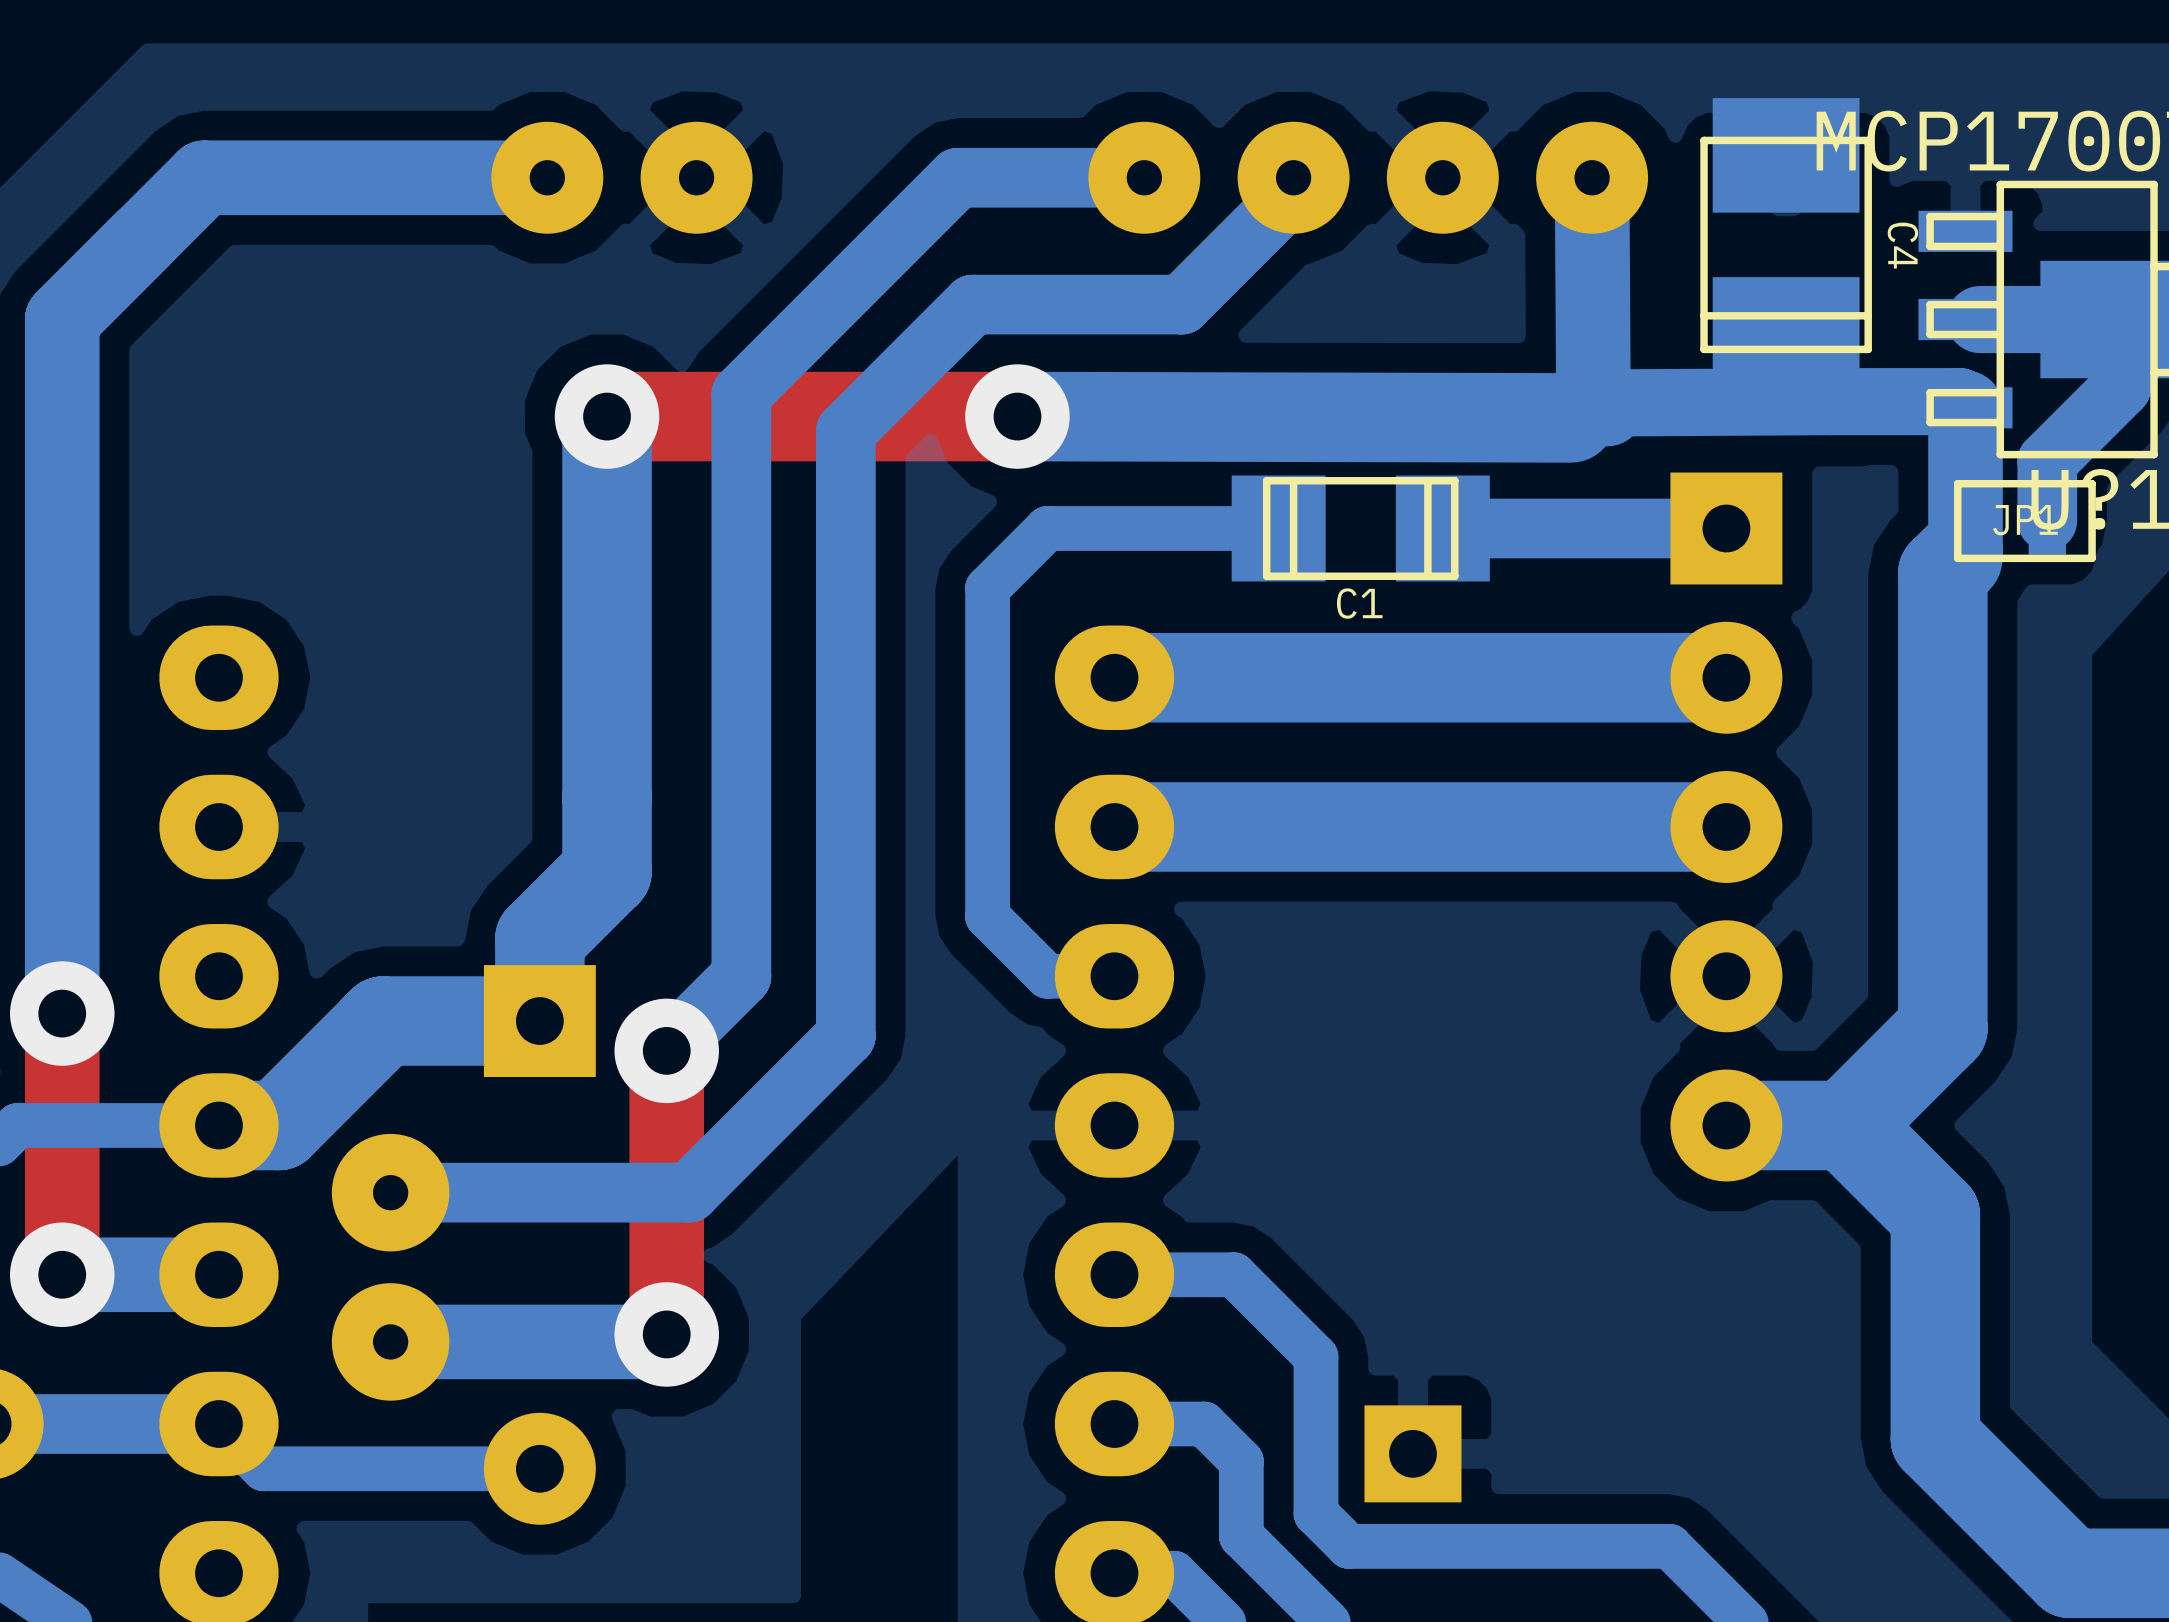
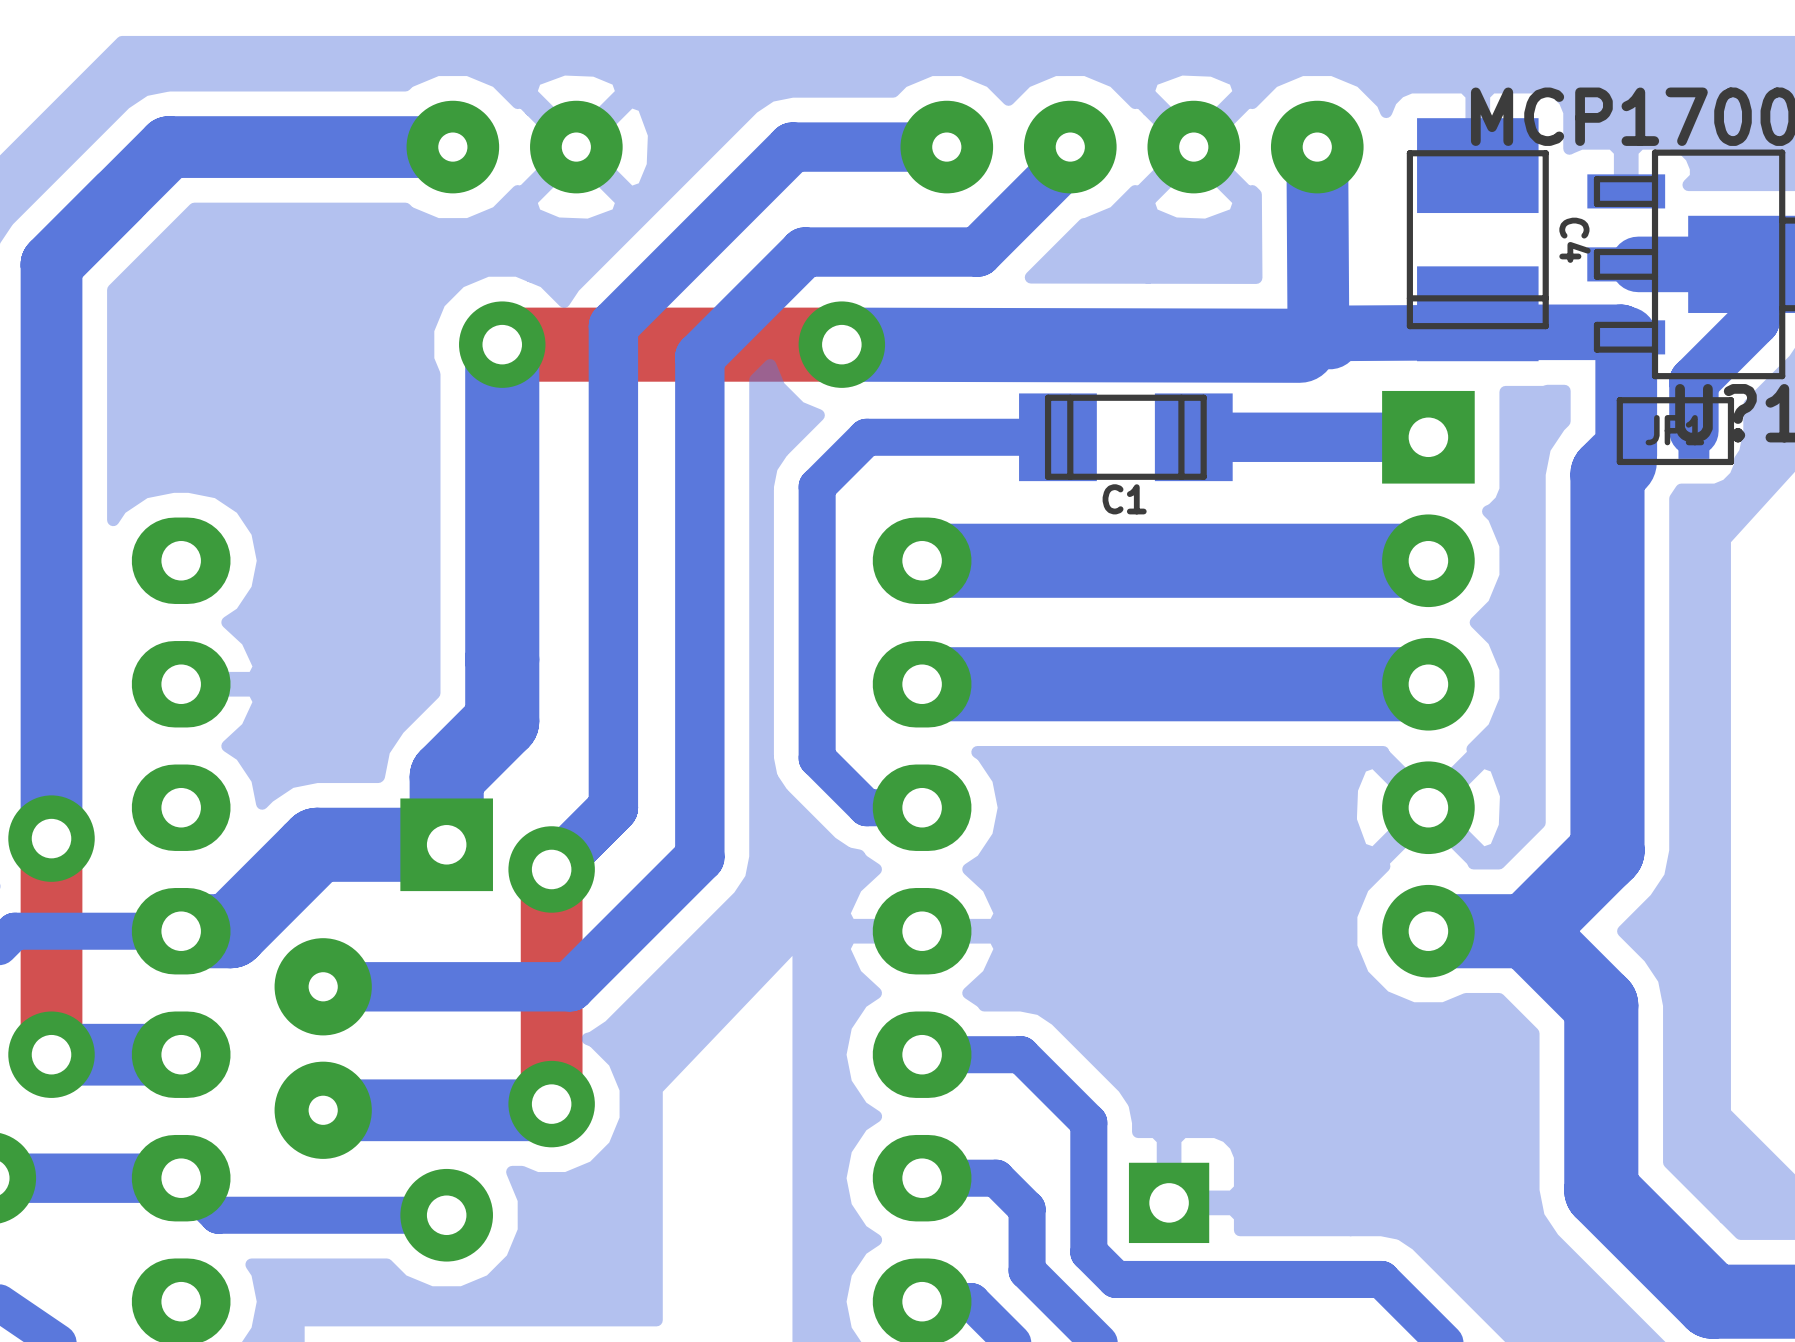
C4 position: (1786, 244) -> (1477, 239)

